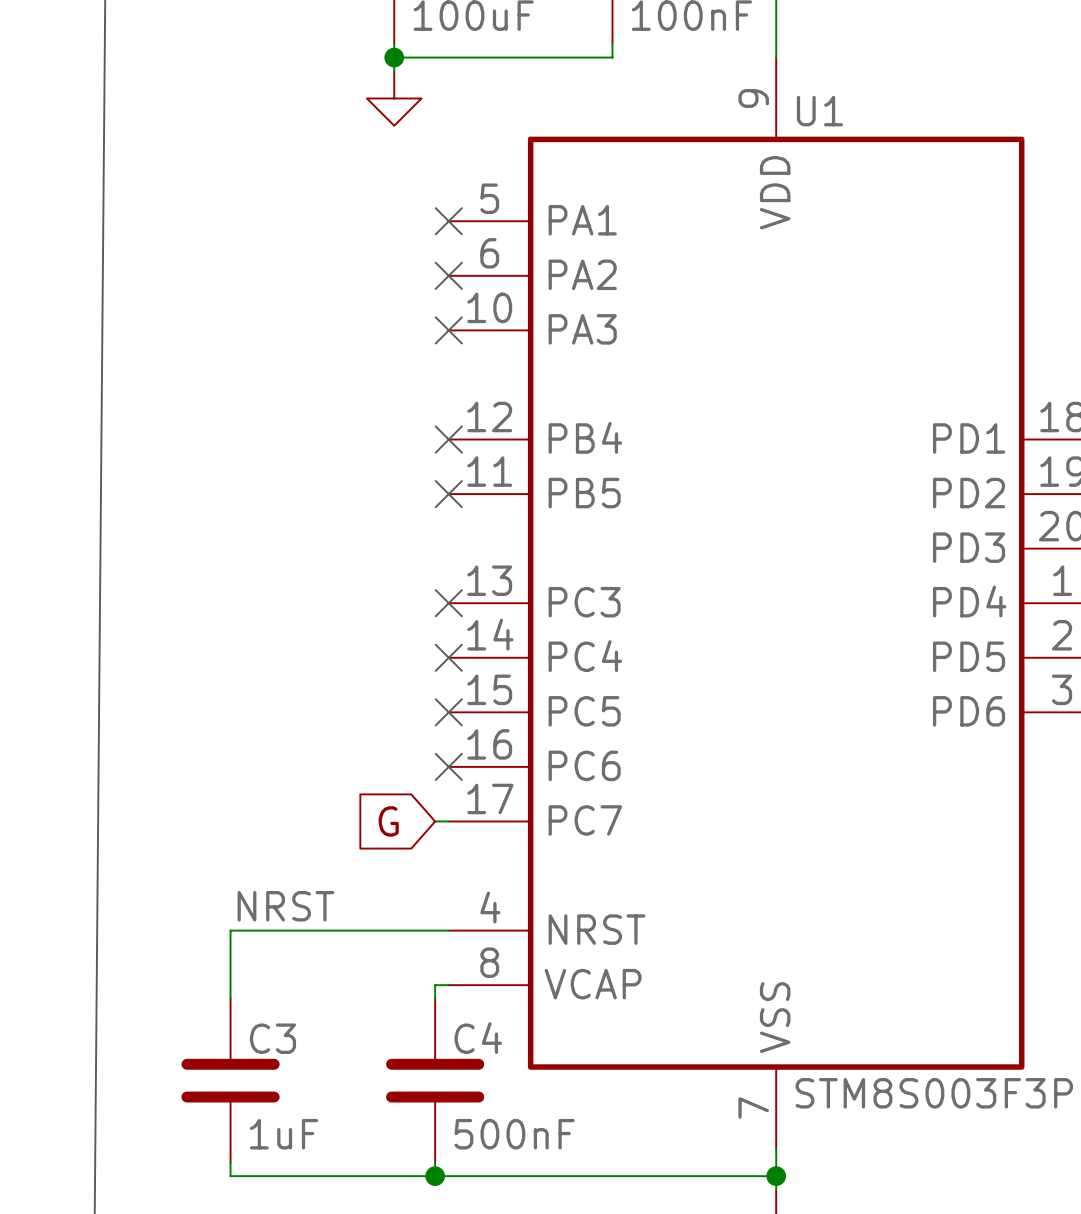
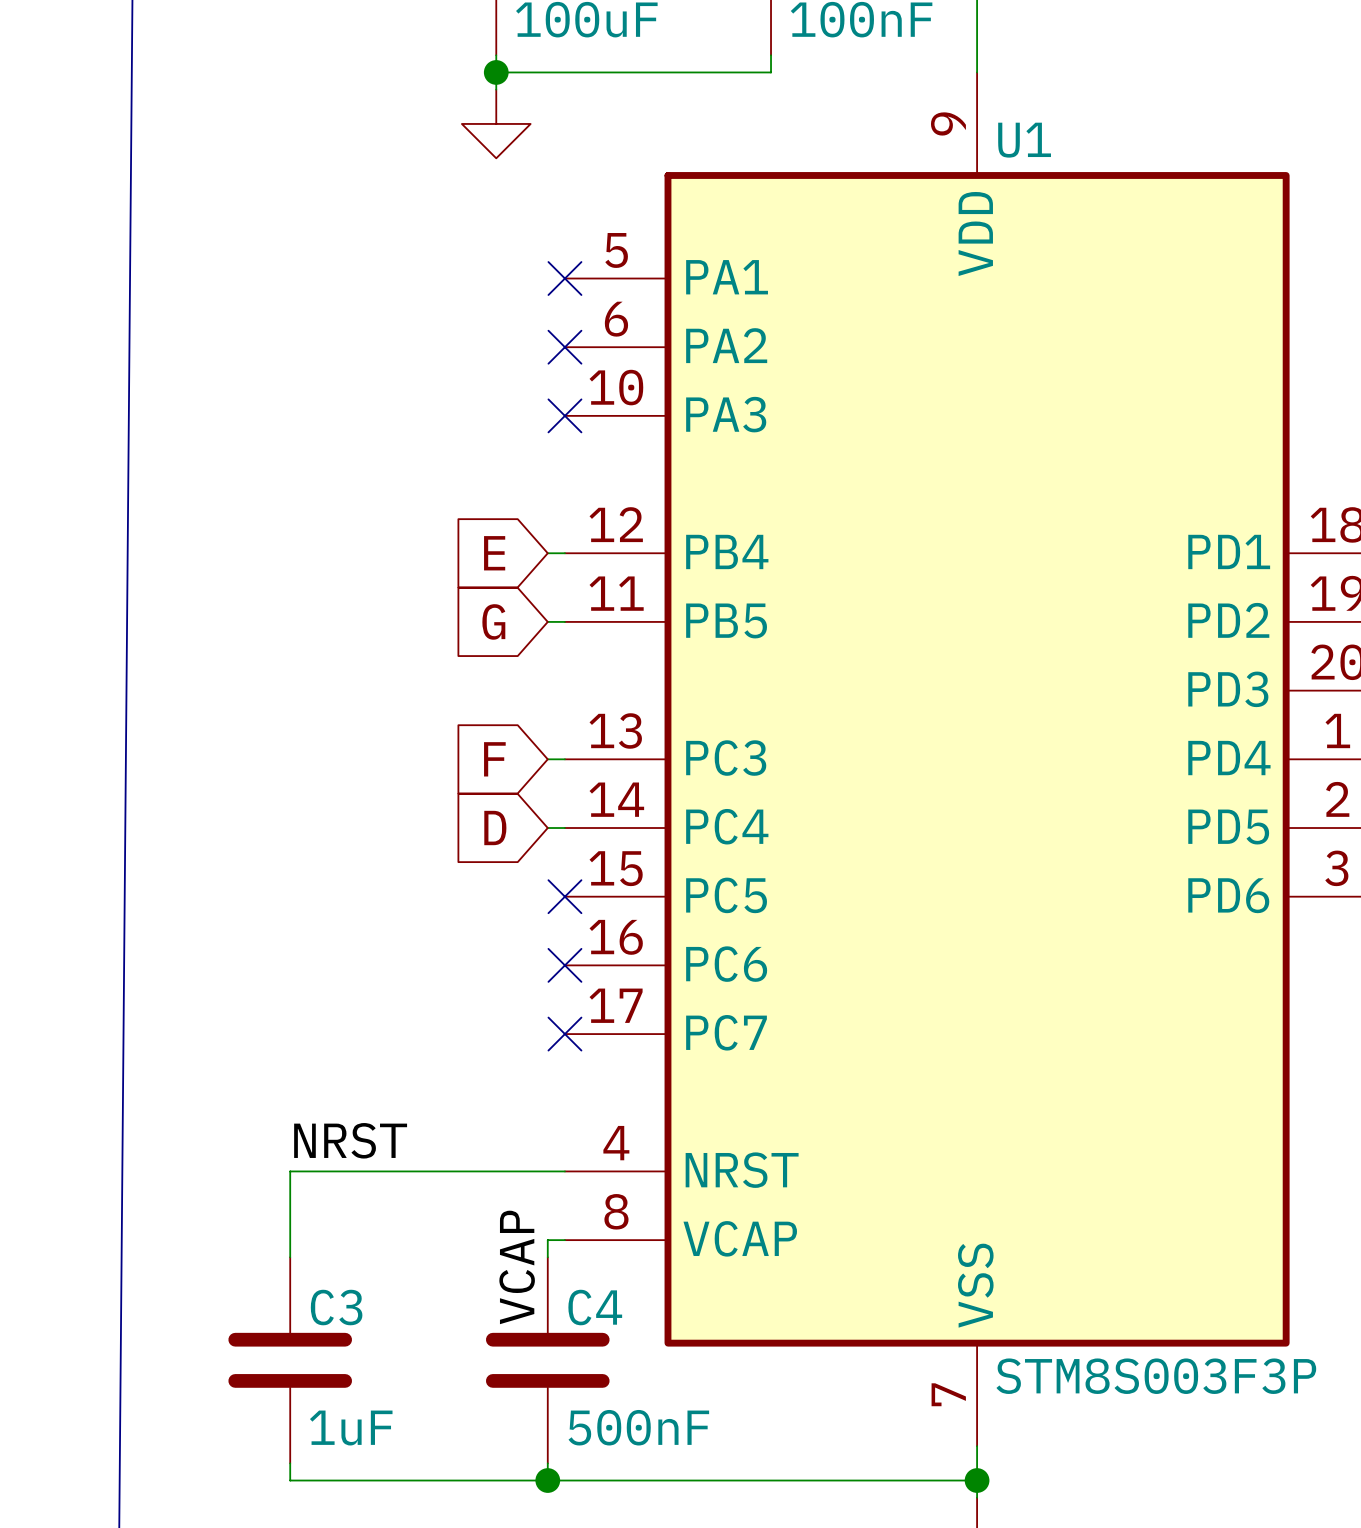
global label: none -> E (494, 553)
wire: none -> (547, 553) (564, 553)
no-connect mark: (448, 439) -> none
wire: none -> (547, 621) (564, 621)
no-connect mark: (448, 494) -> none
global label: none -> F (494, 759)
wire: none -> (547, 759) (564, 759)
no-connect mark: (448, 603) -> none
global label: none -> D (495, 828)
no-connect mark: (448, 657) -> none
global label position: G (388, 821) -> G (493, 621)
wire: (435, 821) (448, 821) -> (547, 828) (564, 828)
no-connect mark: none -> (564, 1034)
label: none -> VCAP (517, 1267)

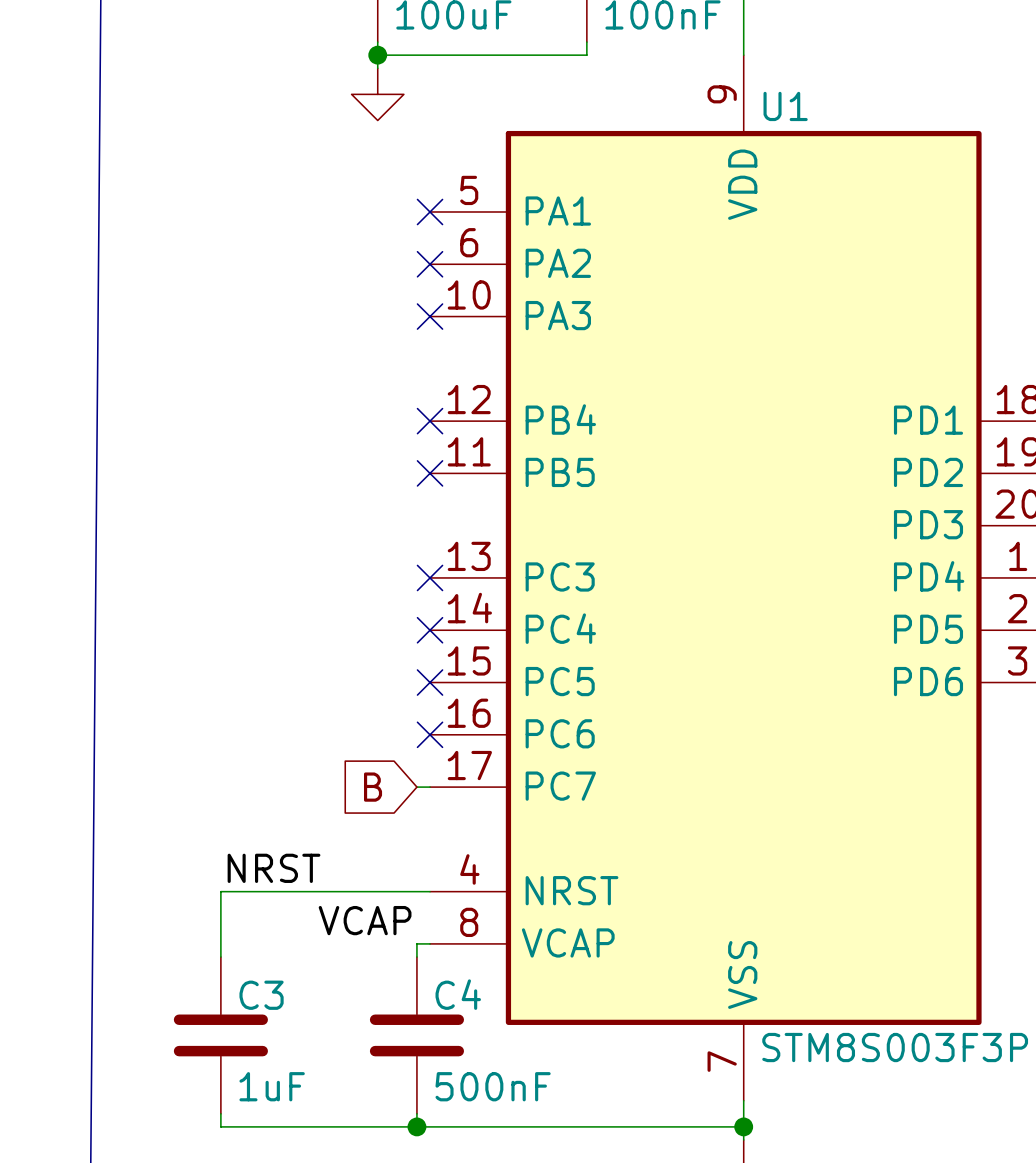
global label: E (494, 553) -> none
wire: (547, 553) (564, 553) -> none
no-connect mark: none -> (430, 421)
global label: G (493, 621) -> none
wire: (547, 621) (564, 621) -> none
no-connect mark: none -> (430, 473)
global label: F (494, 759) -> none
wire: (547, 759) (564, 759) -> none
no-connect mark: none -> (430, 577)
global label: D (495, 828) -> none
wire: (547, 828) (564, 828) -> (416, 787) (430, 787)
no-connect mark: none -> (430, 630)
global label: none -> B (373, 787)
no-connect mark: (564, 1034) -> none
label rotation: 0° (517, 1267) -> 90° clockwise (365, 920)

